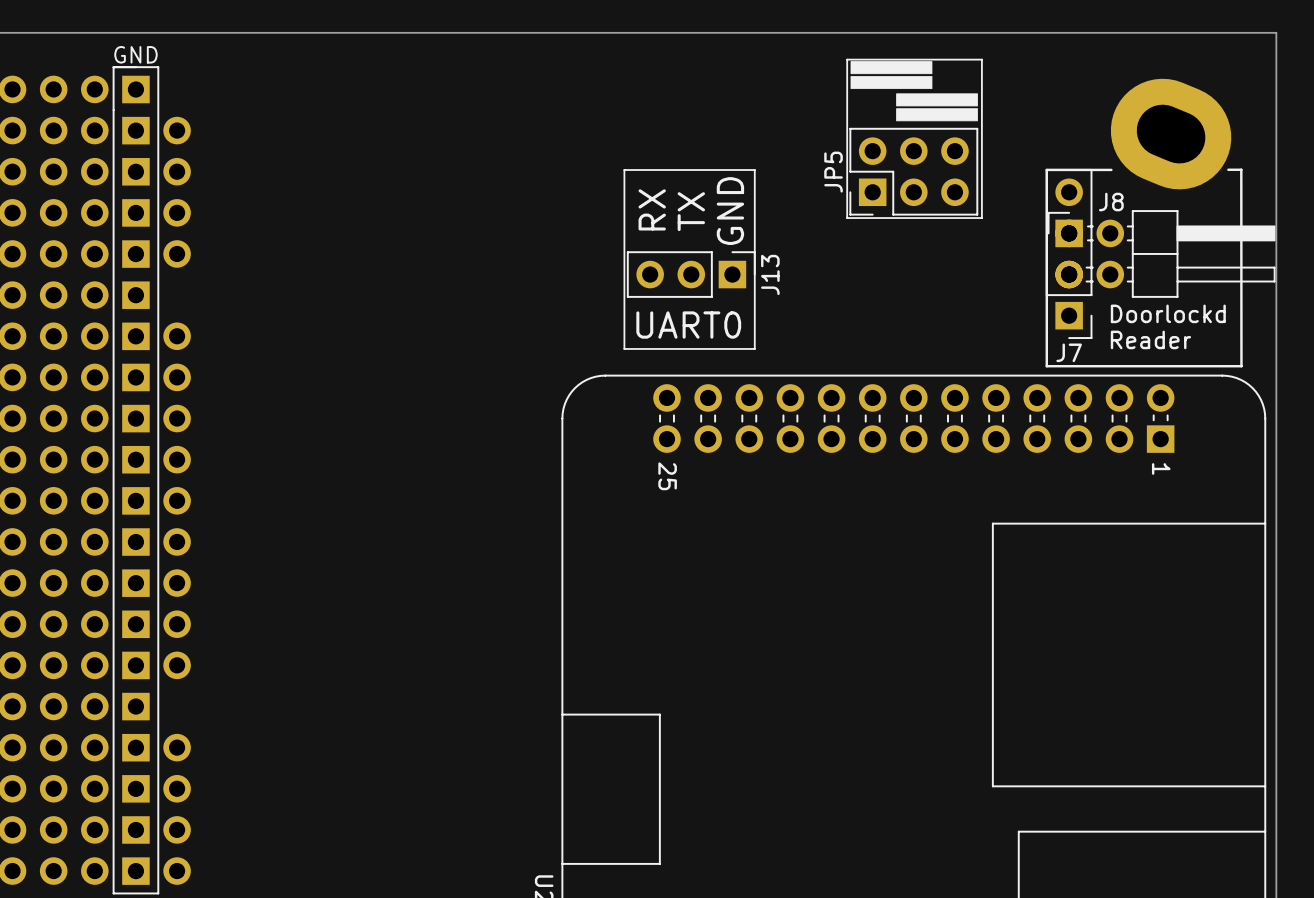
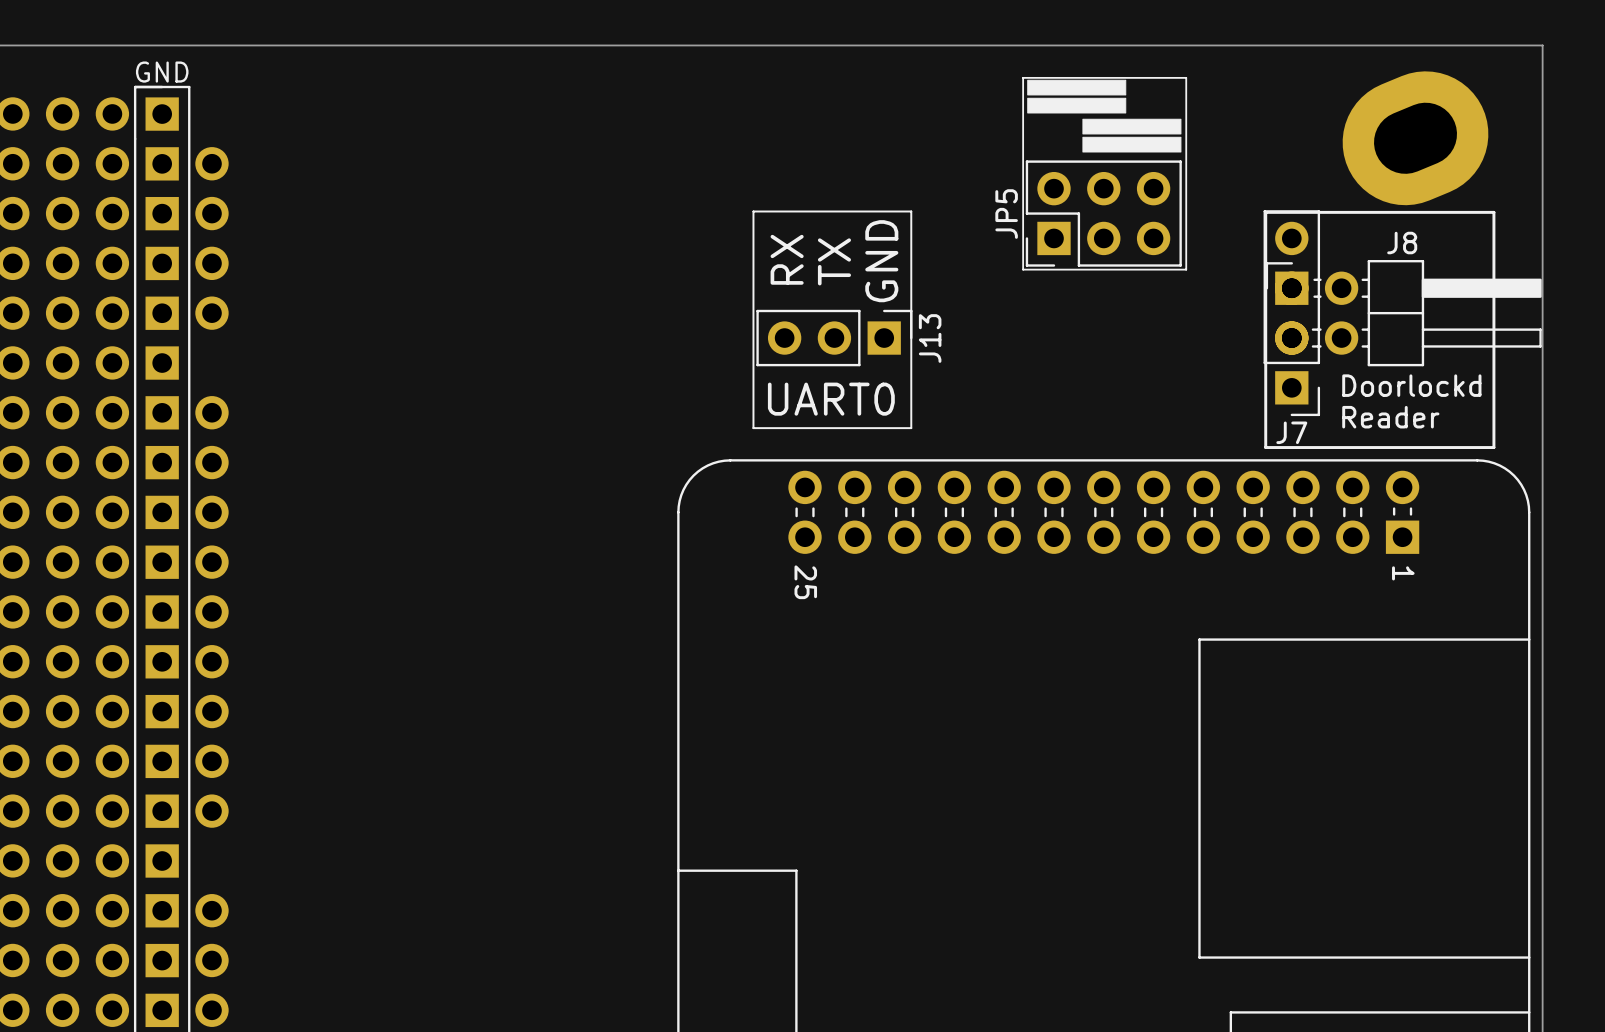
part: none -> (1415, 138)
part: (1171, 134) -> none
line: (1228, 169) (1241, 169) (1241, 366) (1046, 366) (1046, 169) (1111, 169) -> none
line: none -> (1265, 212) (1493, 212) (1493, 447) (1265, 447) (1265, 212)
J8 name position: J8 (1111, 202) -> J8 (1402, 243)

